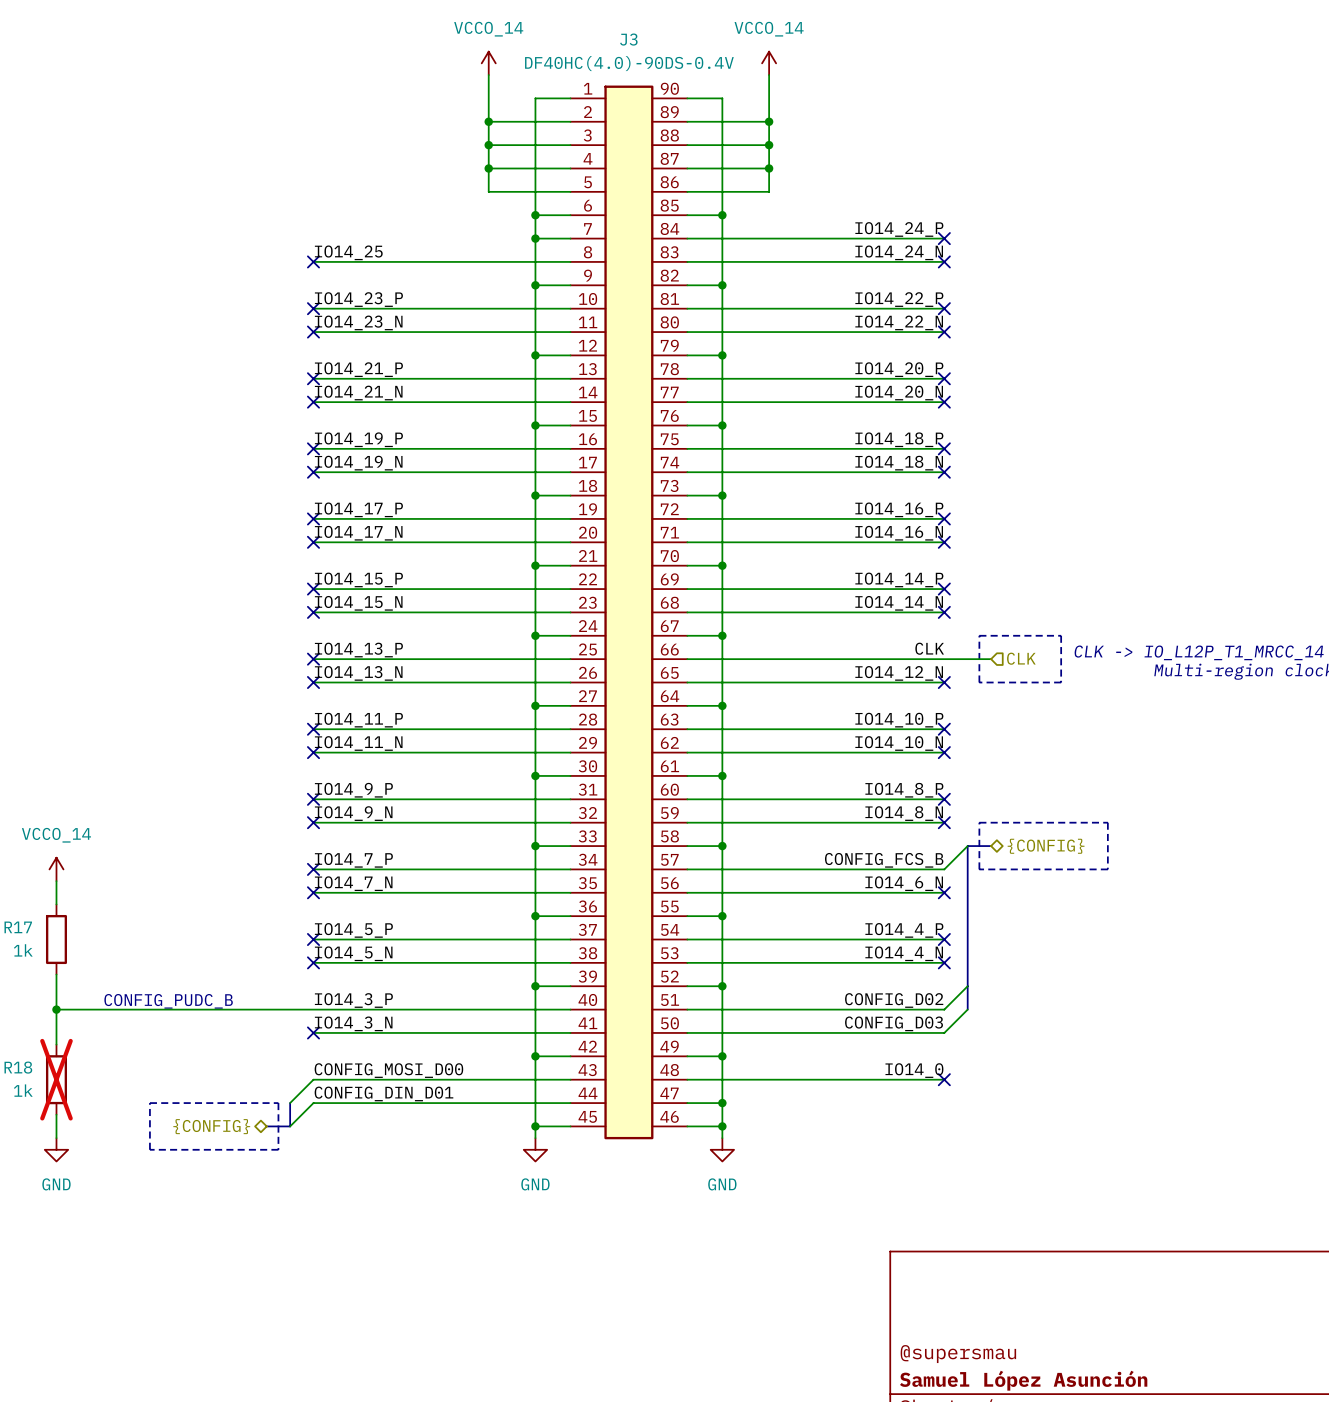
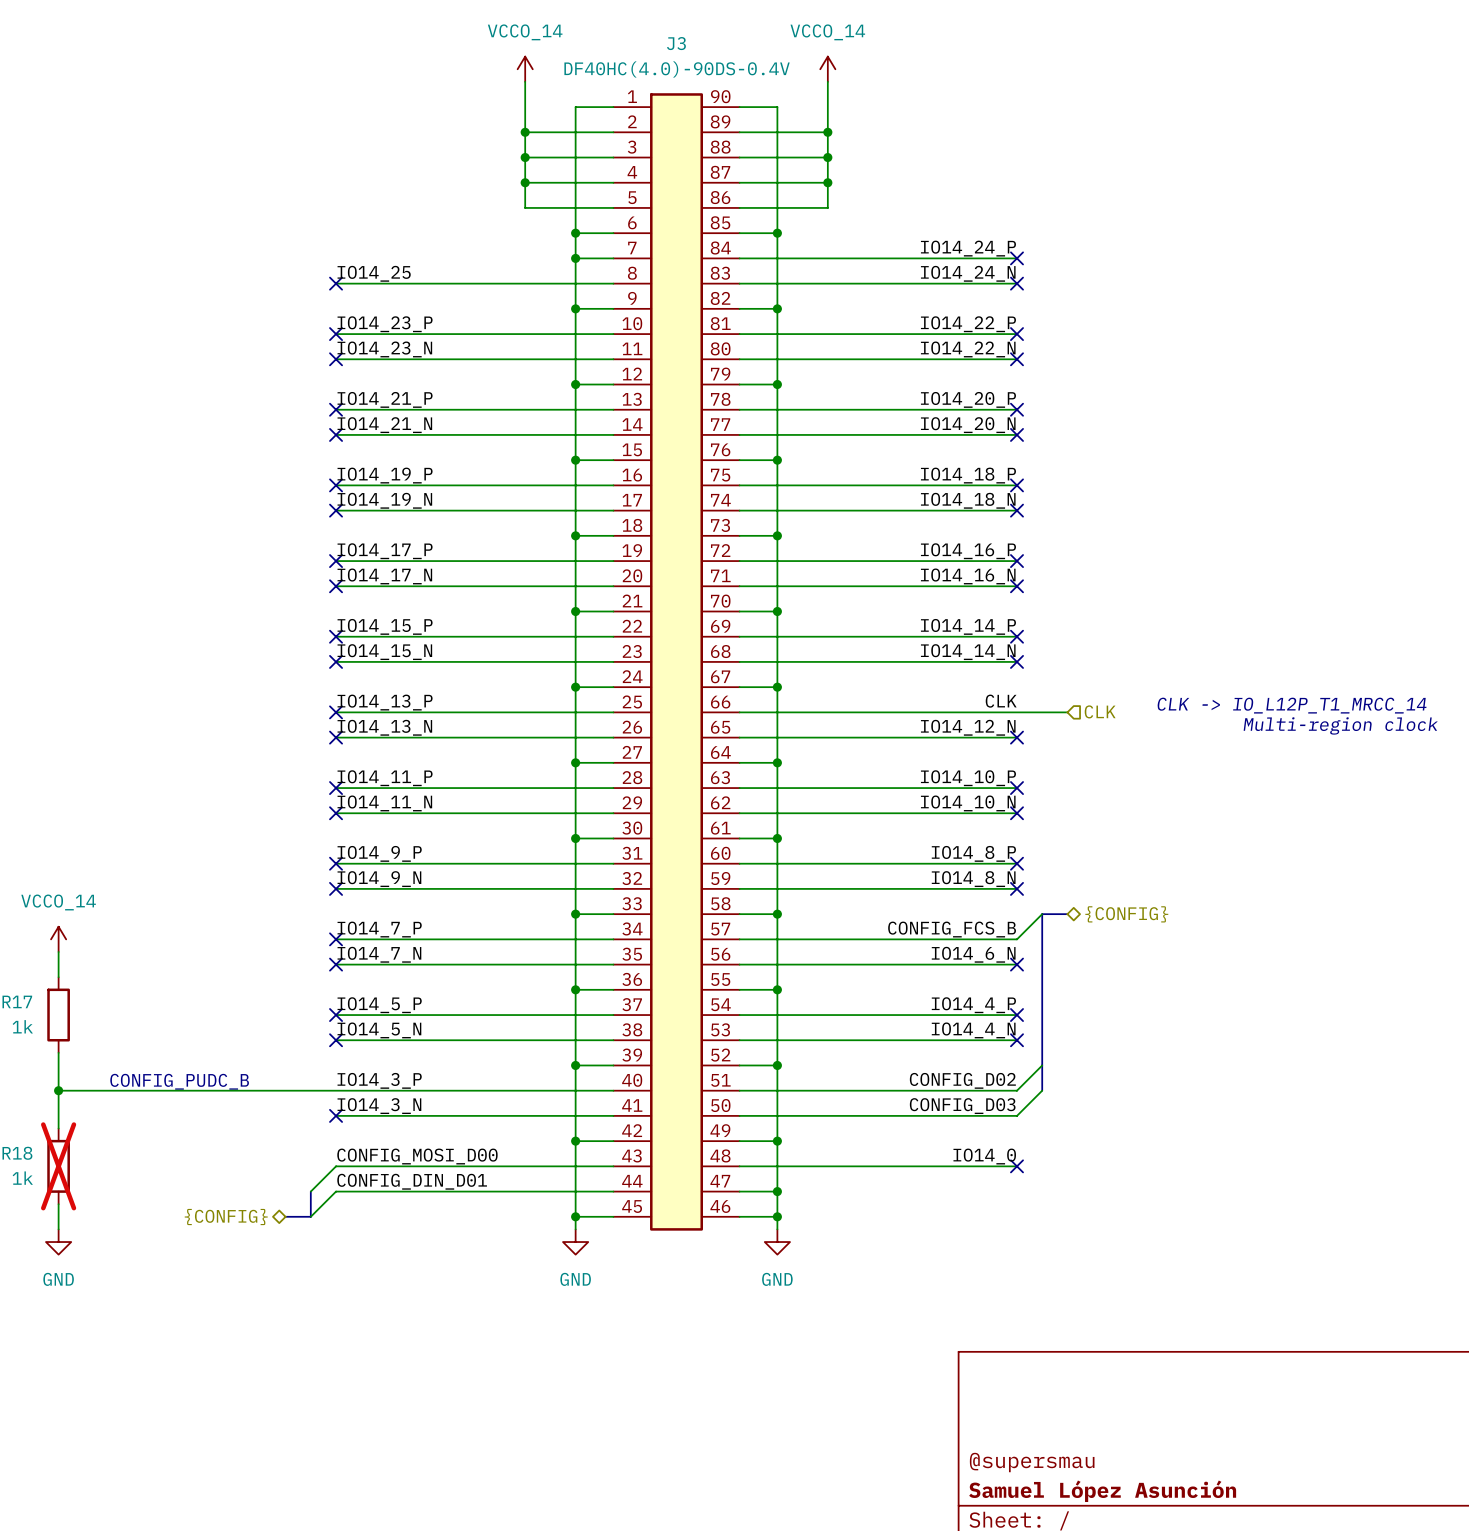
line: (979, 635) (1061, 635) (1061, 682) (979, 682) (979, 635) -> none
line: (979, 822) (979, 869) (1107, 869) (1107, 822) (979, 822) -> none
line: (149, 1103) (278, 1103) (278, 1149) (149, 1149) (149, 1103) -> none

